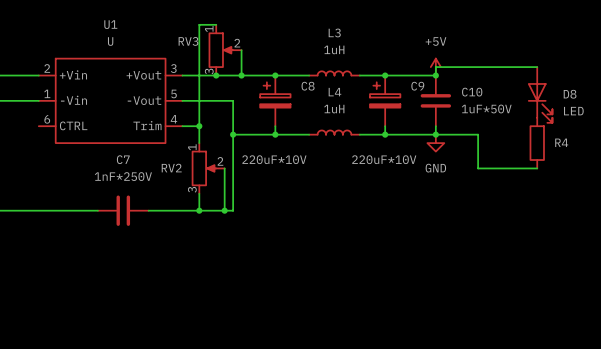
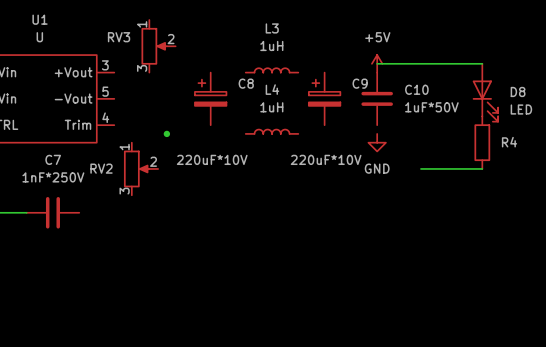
wire: (216, 24) (199, 24) (199, 143) -> none
wire: (241, 50) (241, 75) -> none
wire: (435, 67) (435, 75) (359, 75) -> none
wire: (182, 75) (309, 75) -> none
junction: (216, 75) -> none
junction: (241, 75) -> none
junction: (275, 75) -> none
junction: (385, 75) -> none
junction: (435, 75) -> none
wire: (182, 100) (233, 100) (233, 210) (148, 210) -> none
wire: (182, 126) (199, 126) -> none
junction: (199, 126) -> none
wire: (275, 126) (275, 134) -> none
wire: (385, 126) (385, 134) -> none
wire: (435, 126) (435, 134) -> none
wire: (233, 134) (309, 134) -> none
junction: (275, 134) -> none
wire: (359, 134) (478, 134) (478, 168) -> none
junction: (385, 134) -> none
junction: (435, 134) -> none
wire: (224, 168) (224, 210) -> none
wire: (199, 193) (199, 210) -> none
junction: (199, 210) -> none
junction: (224, 210) -> none

